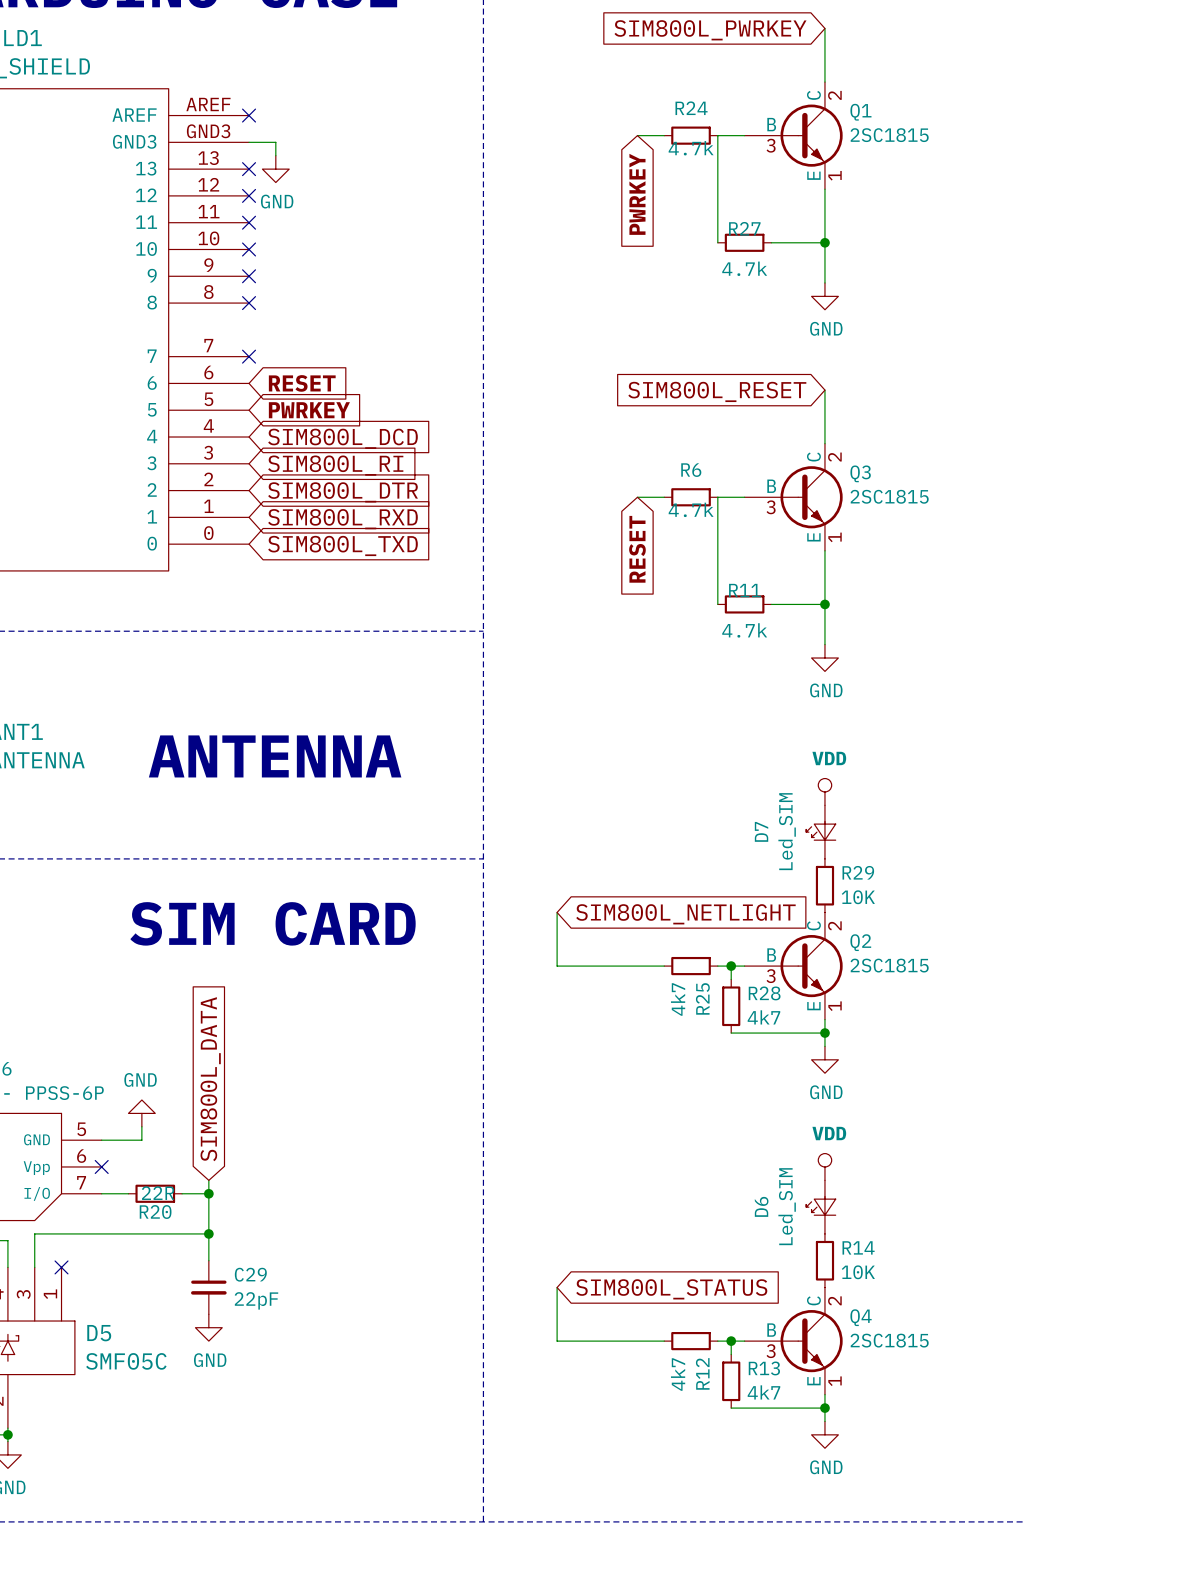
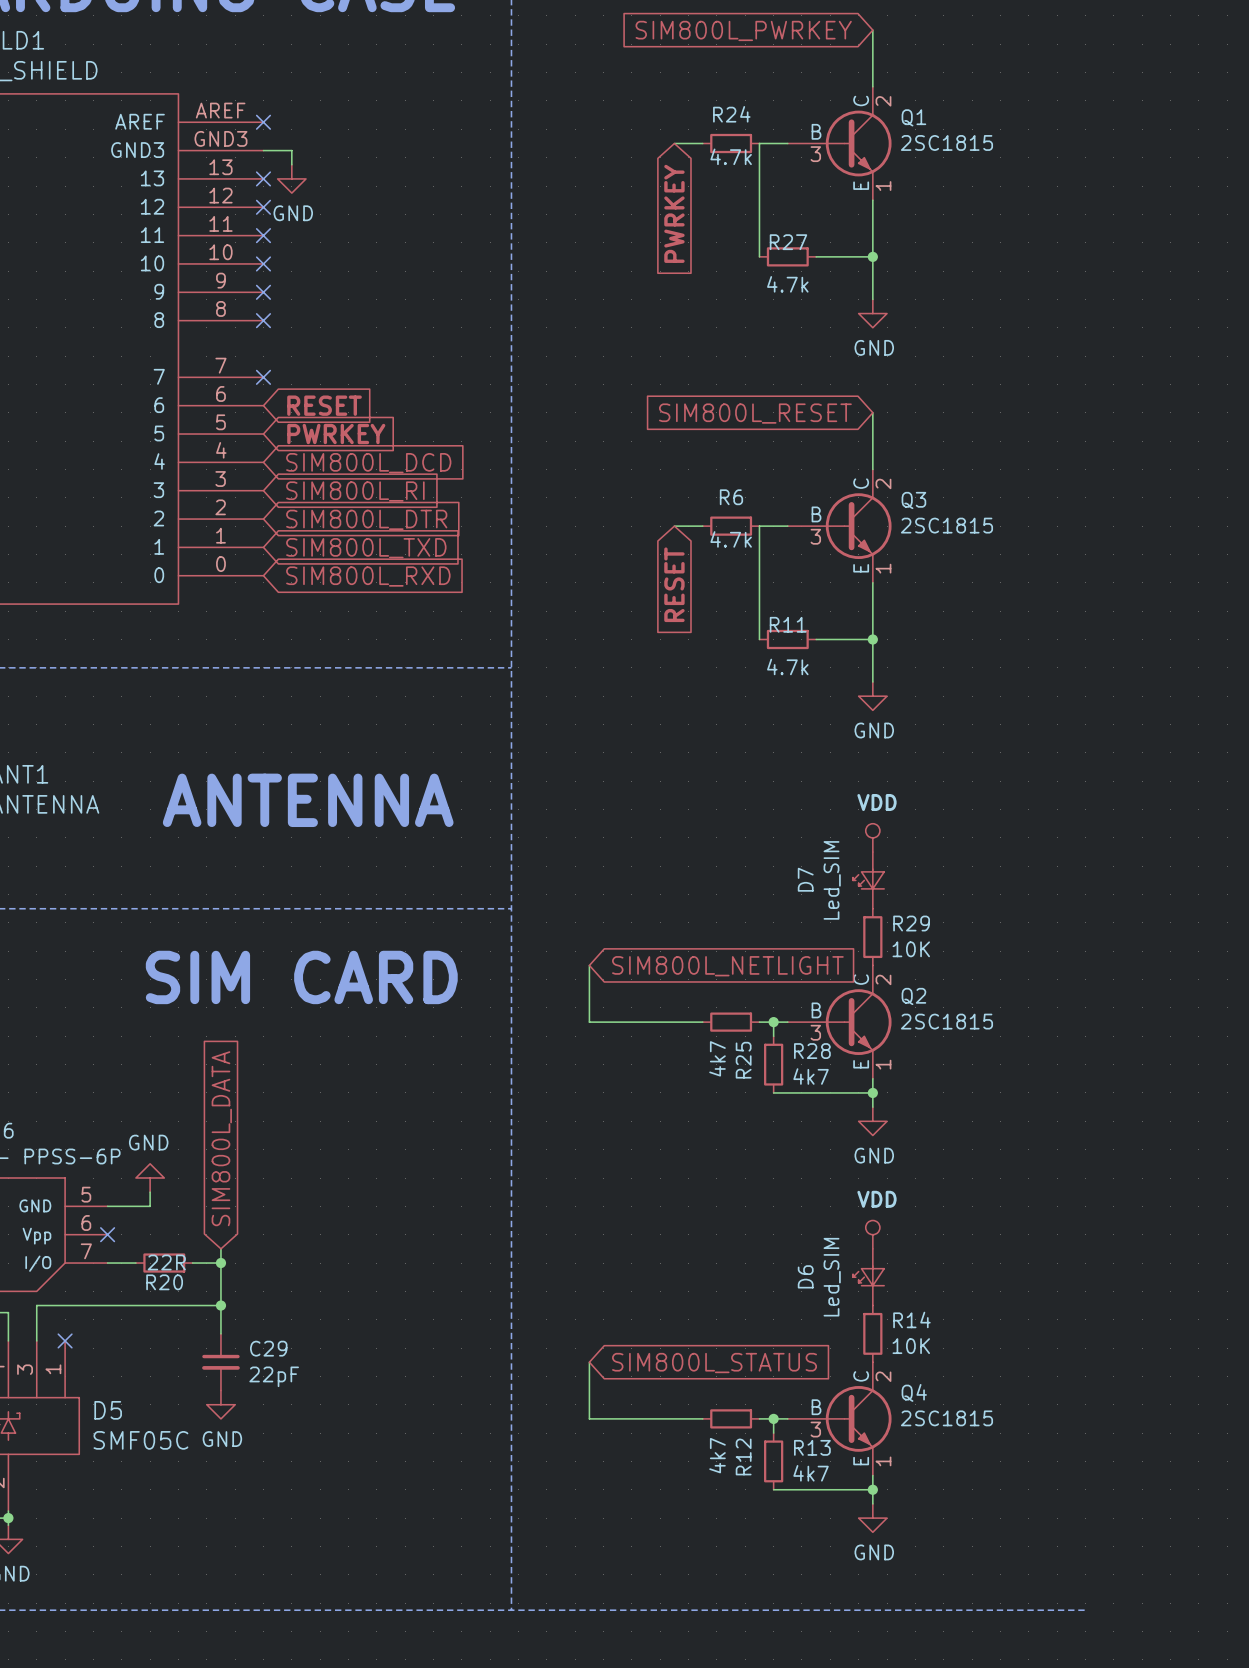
global label: SIM800L_RXD (342, 519) -> SIM800L_TXD (366, 548)
global label: SIM800L_TXD (342, 545) -> SIM800L_RXD (368, 576)

